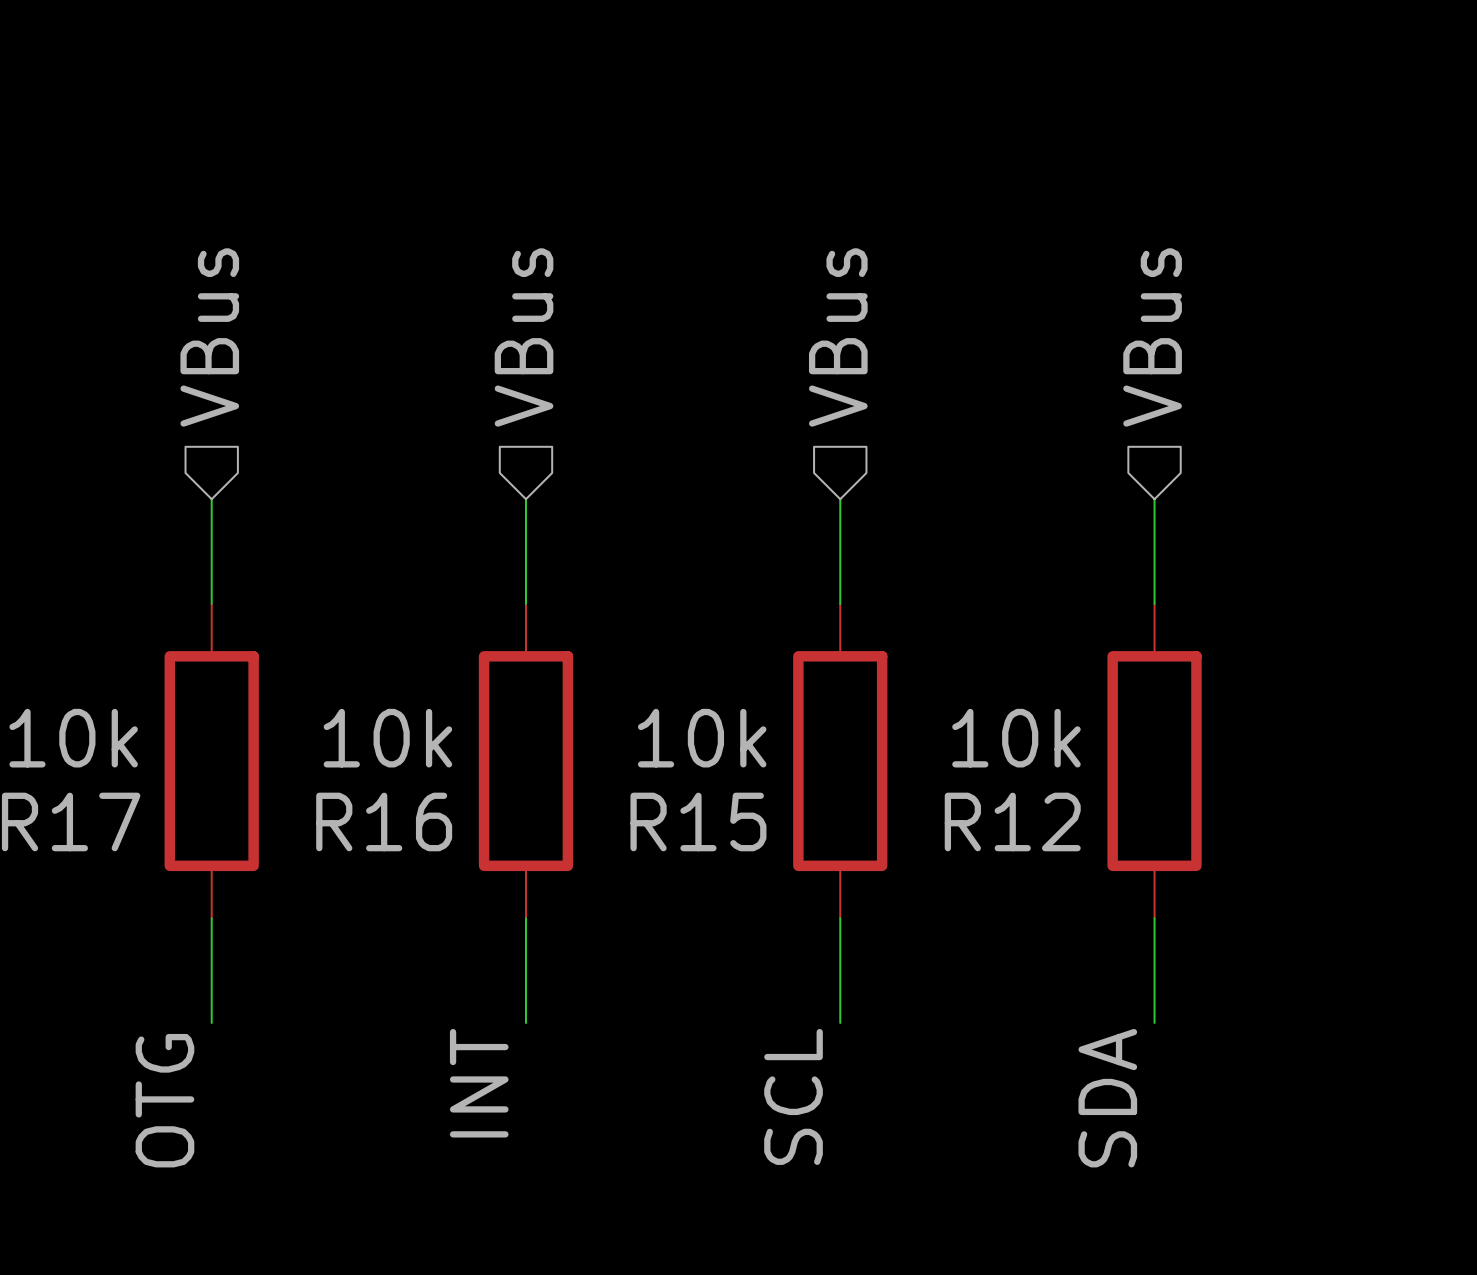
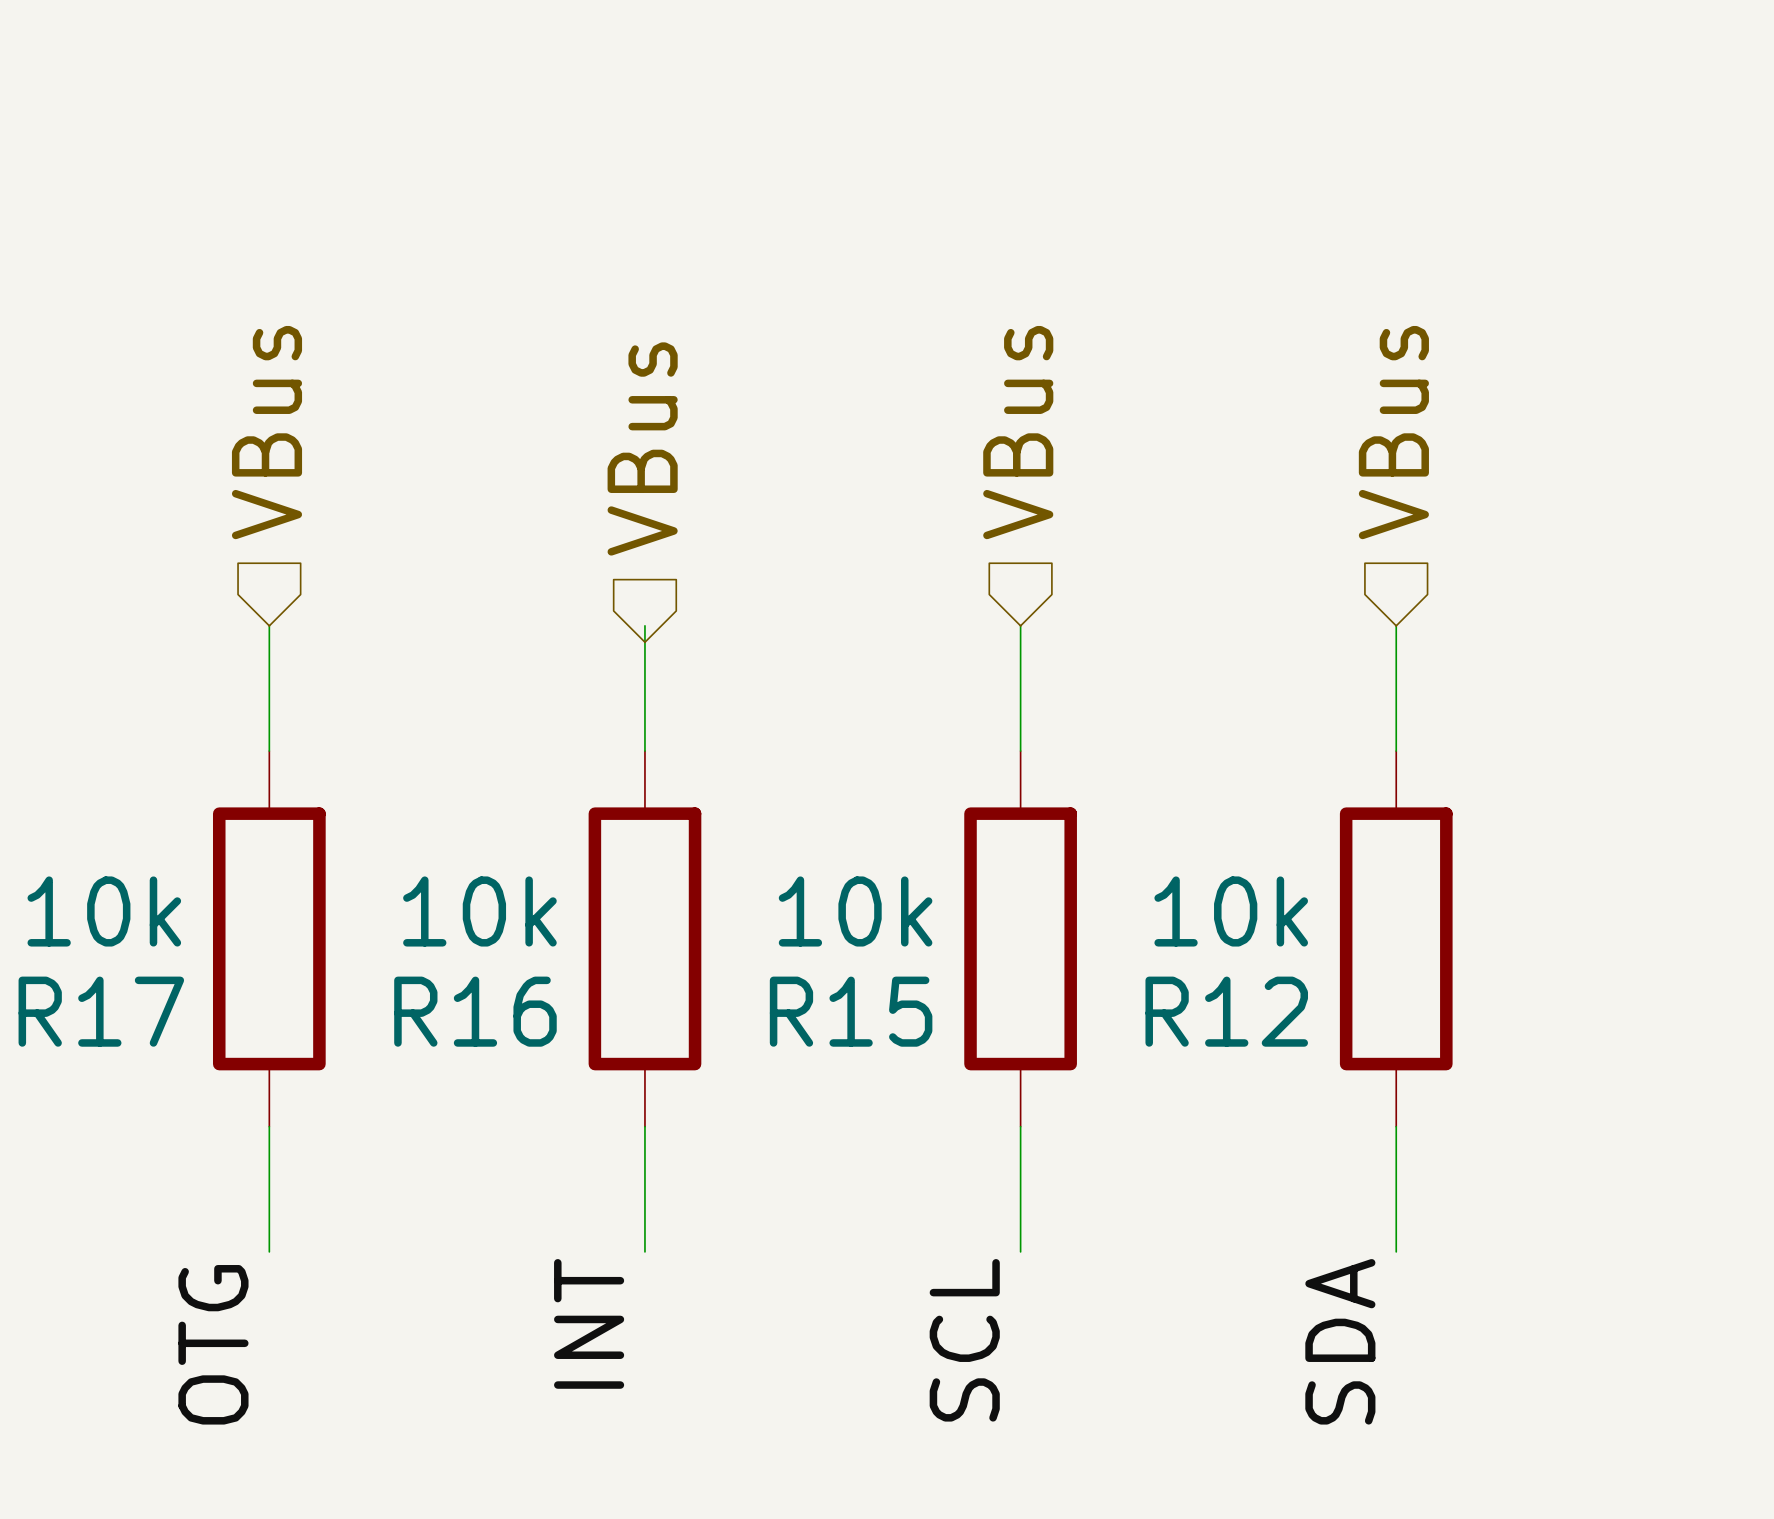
hierarchical label position: VBus (524, 337) -> VBus (642, 448)

